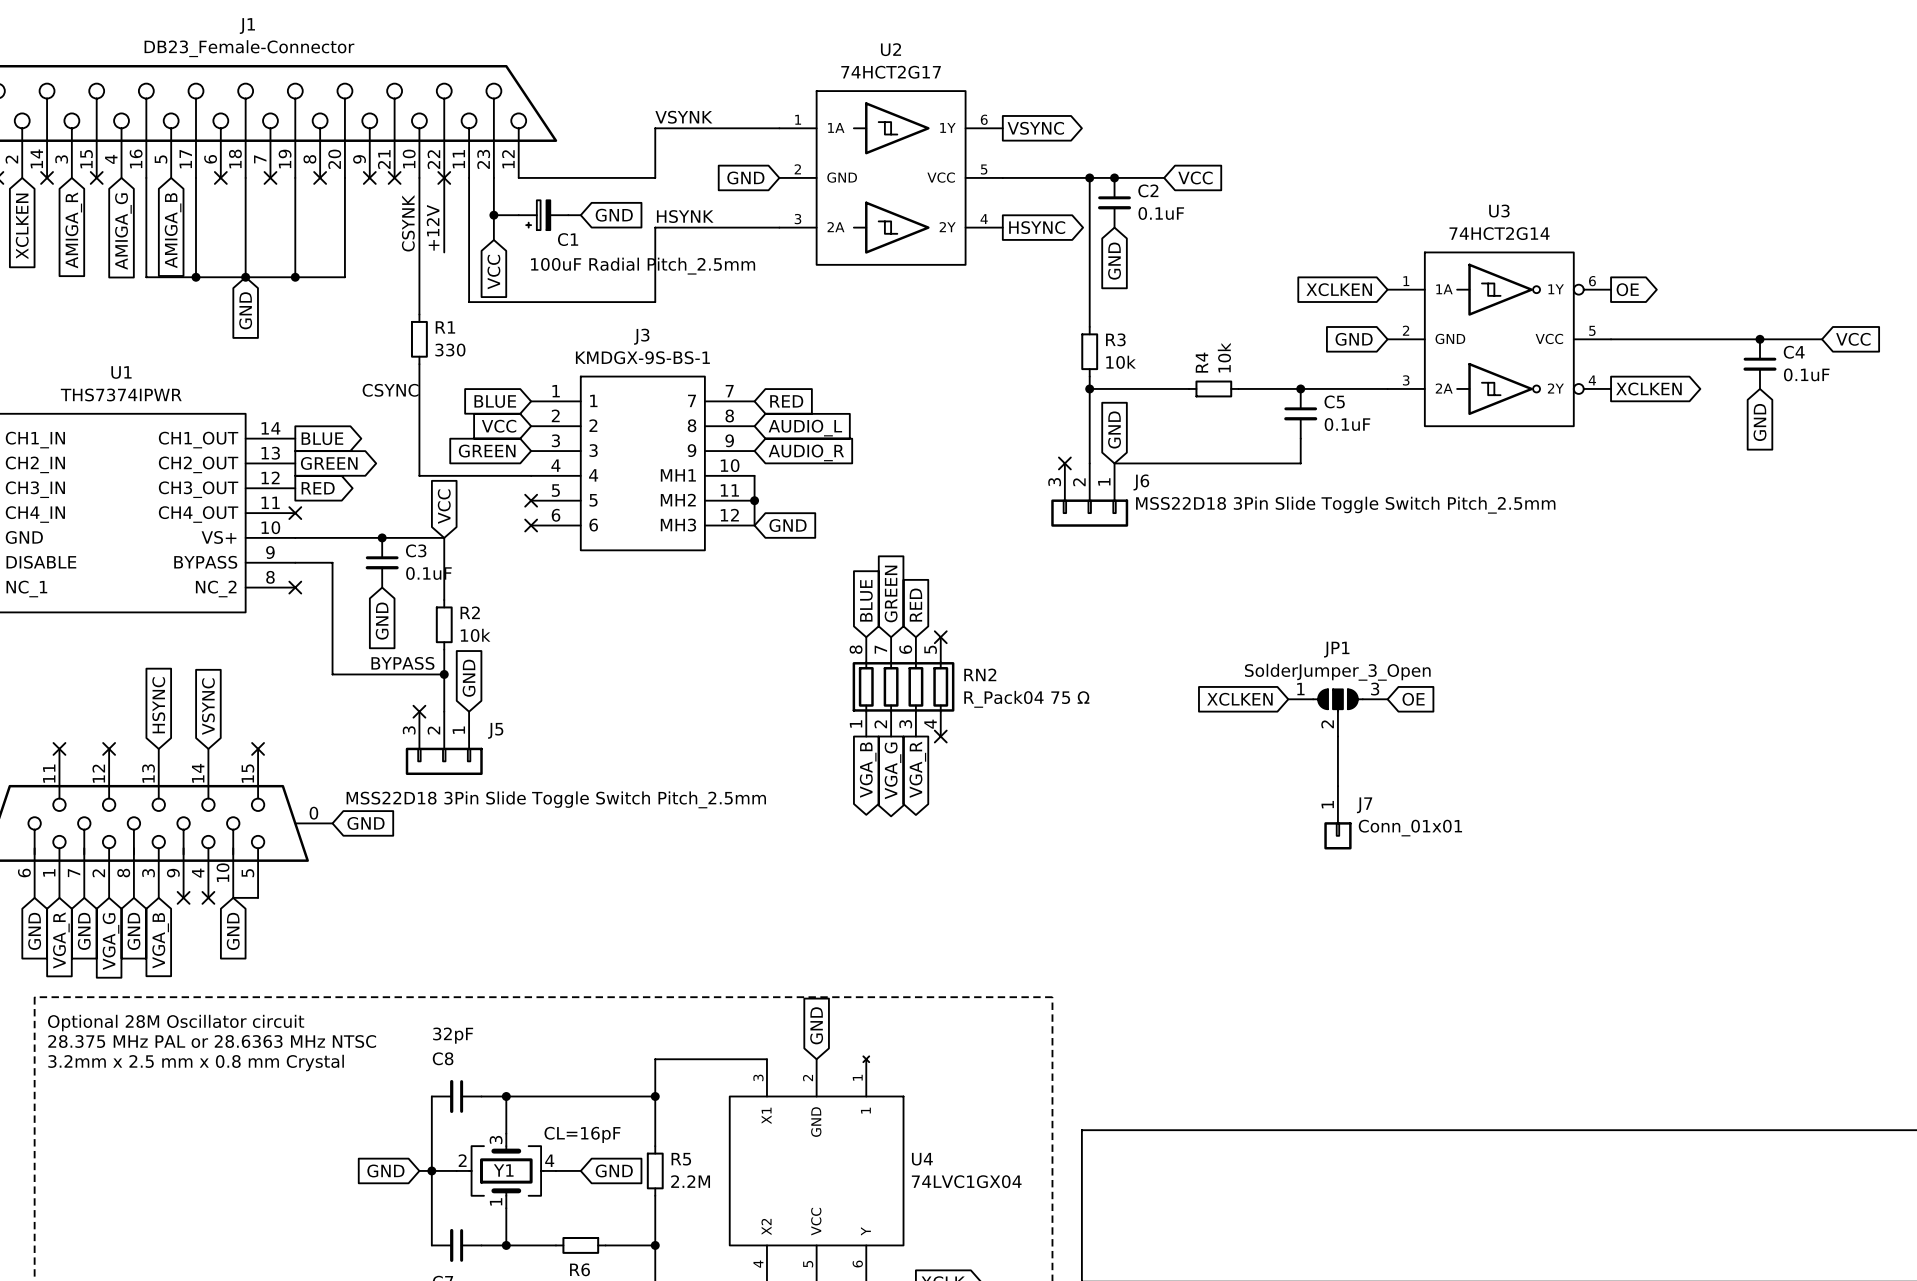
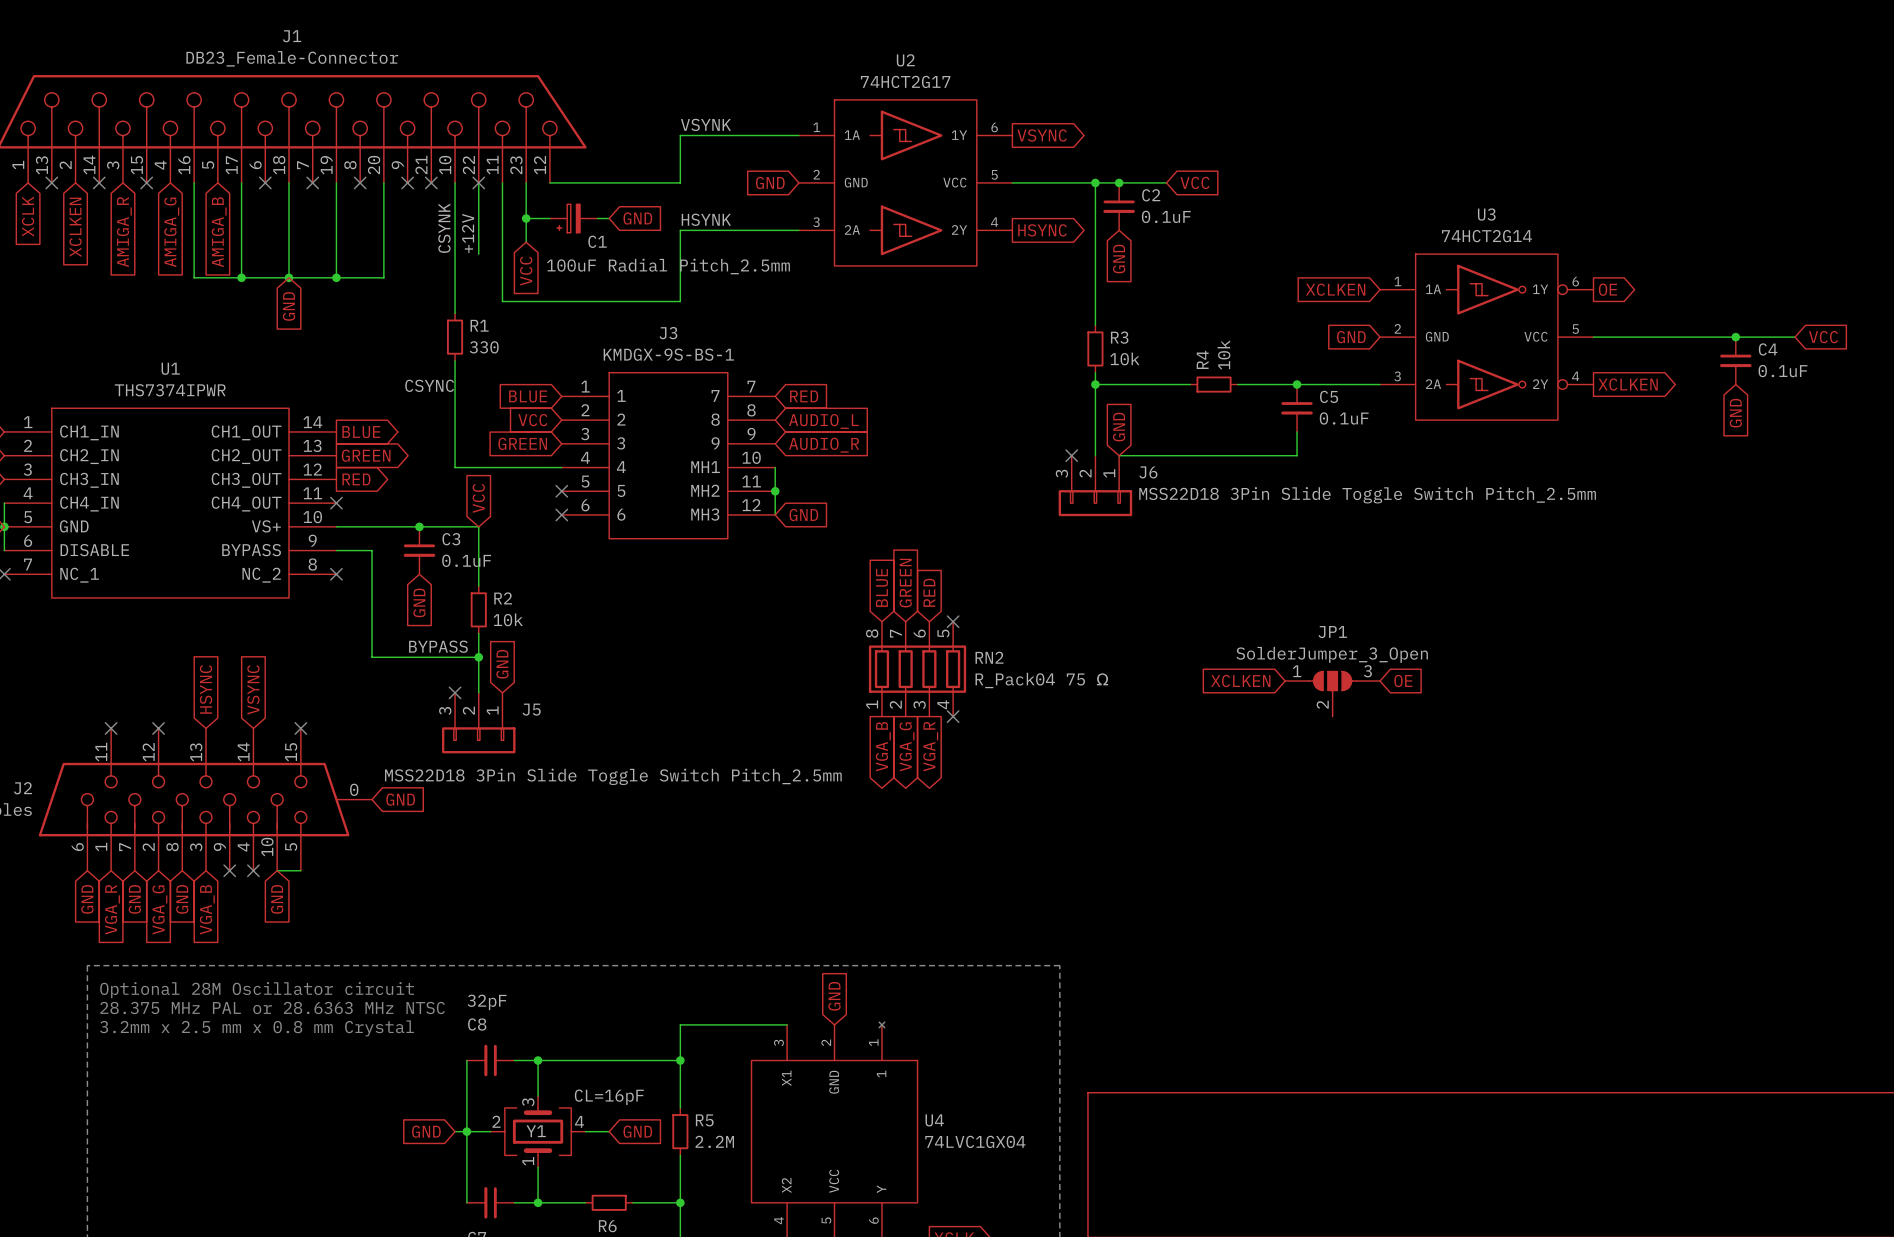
wire: (1337, 736) (1337, 786) -> none
J7: Conn_01x01 (1337, 817) -> none

